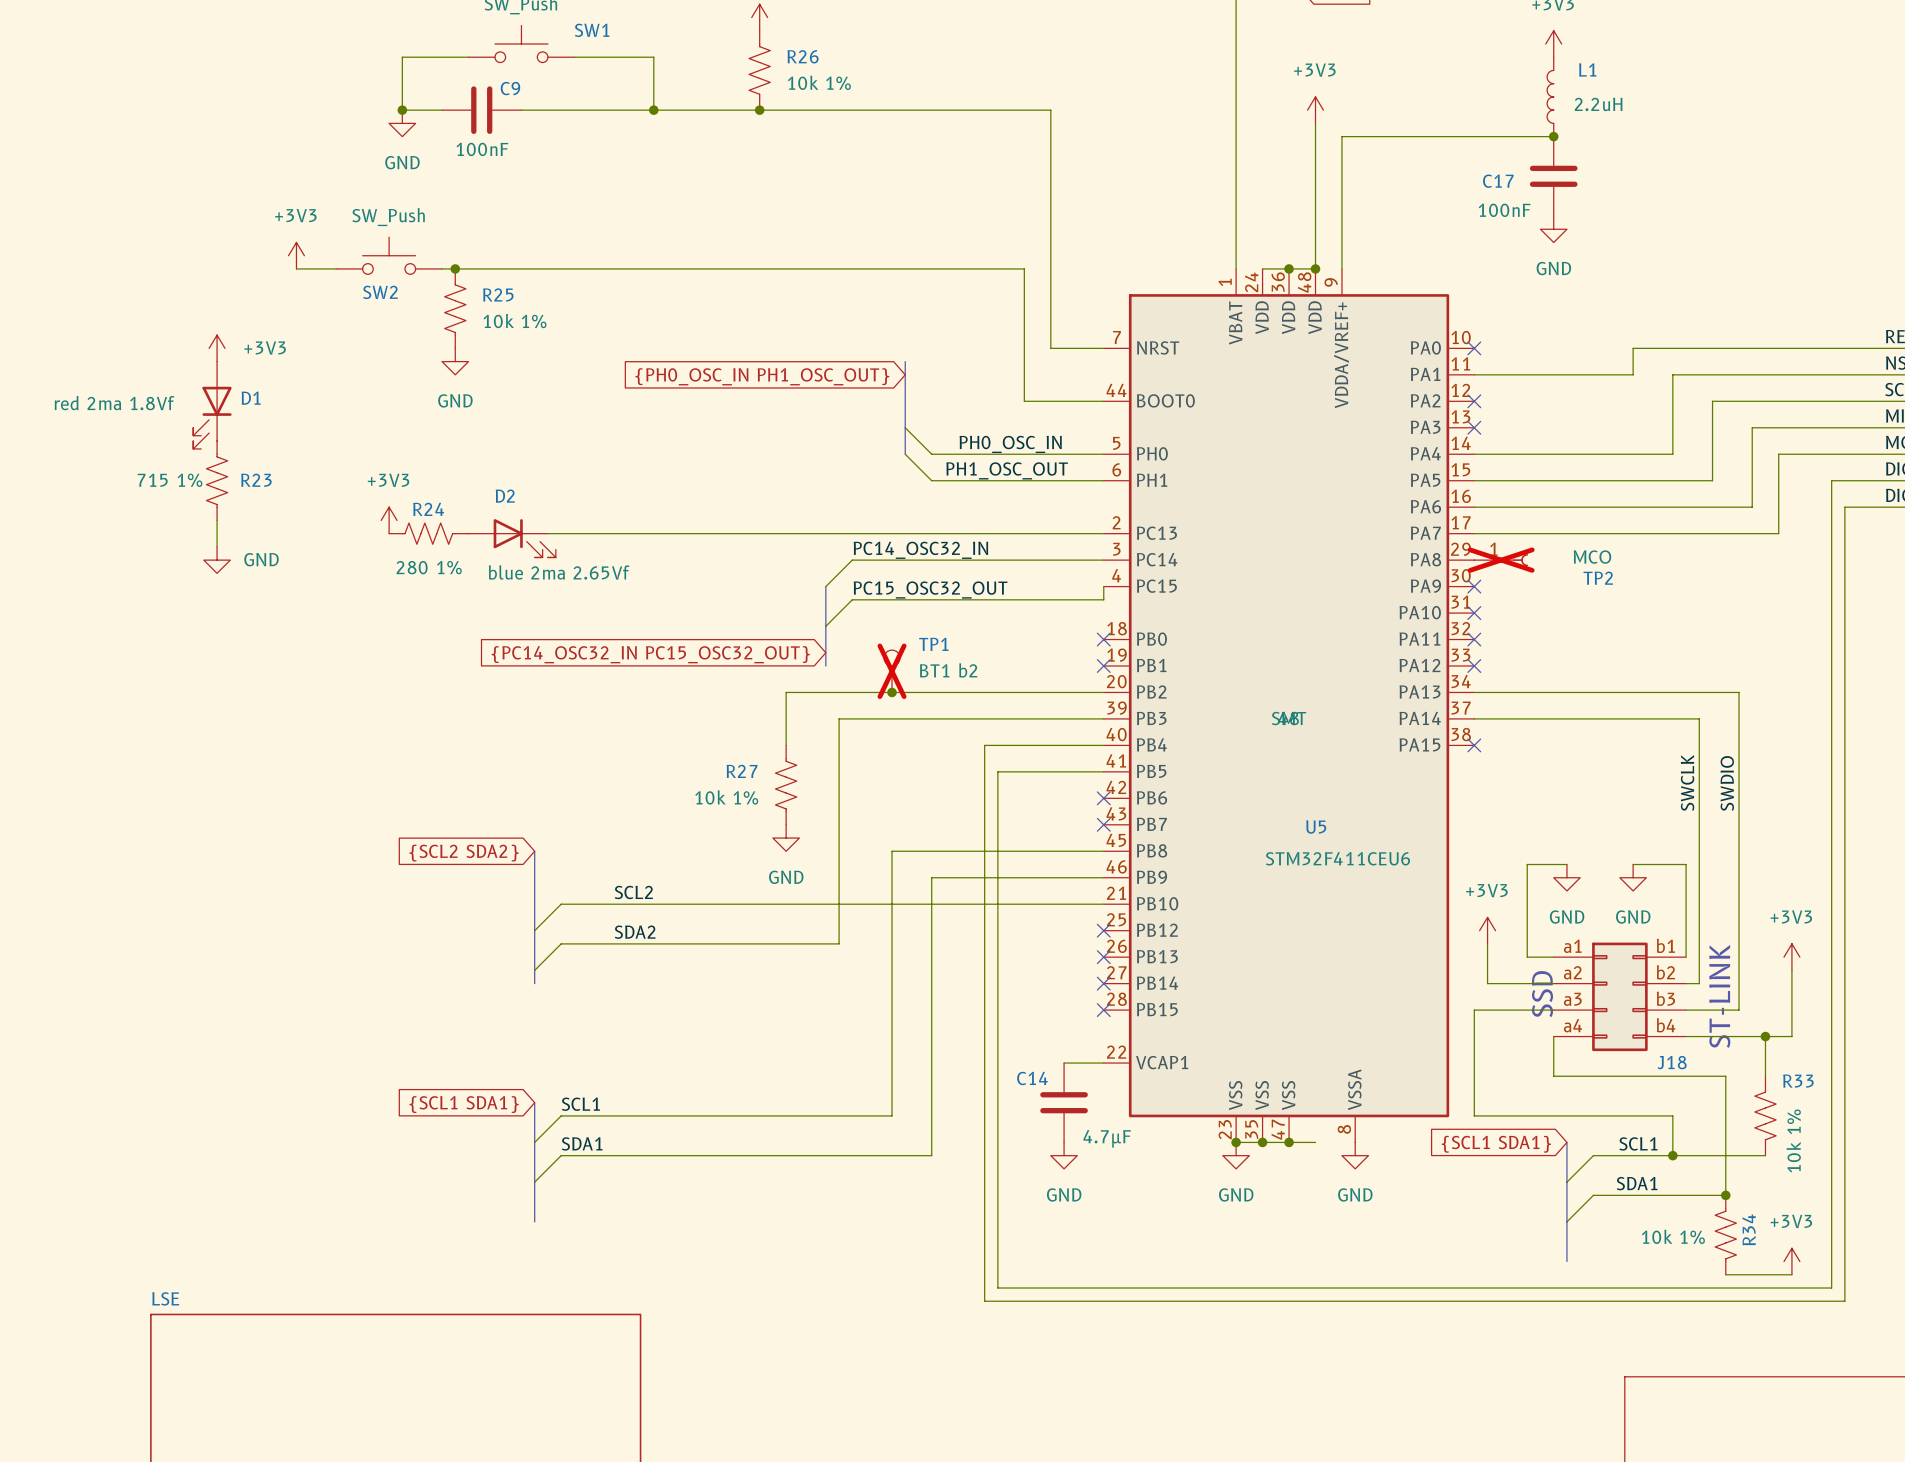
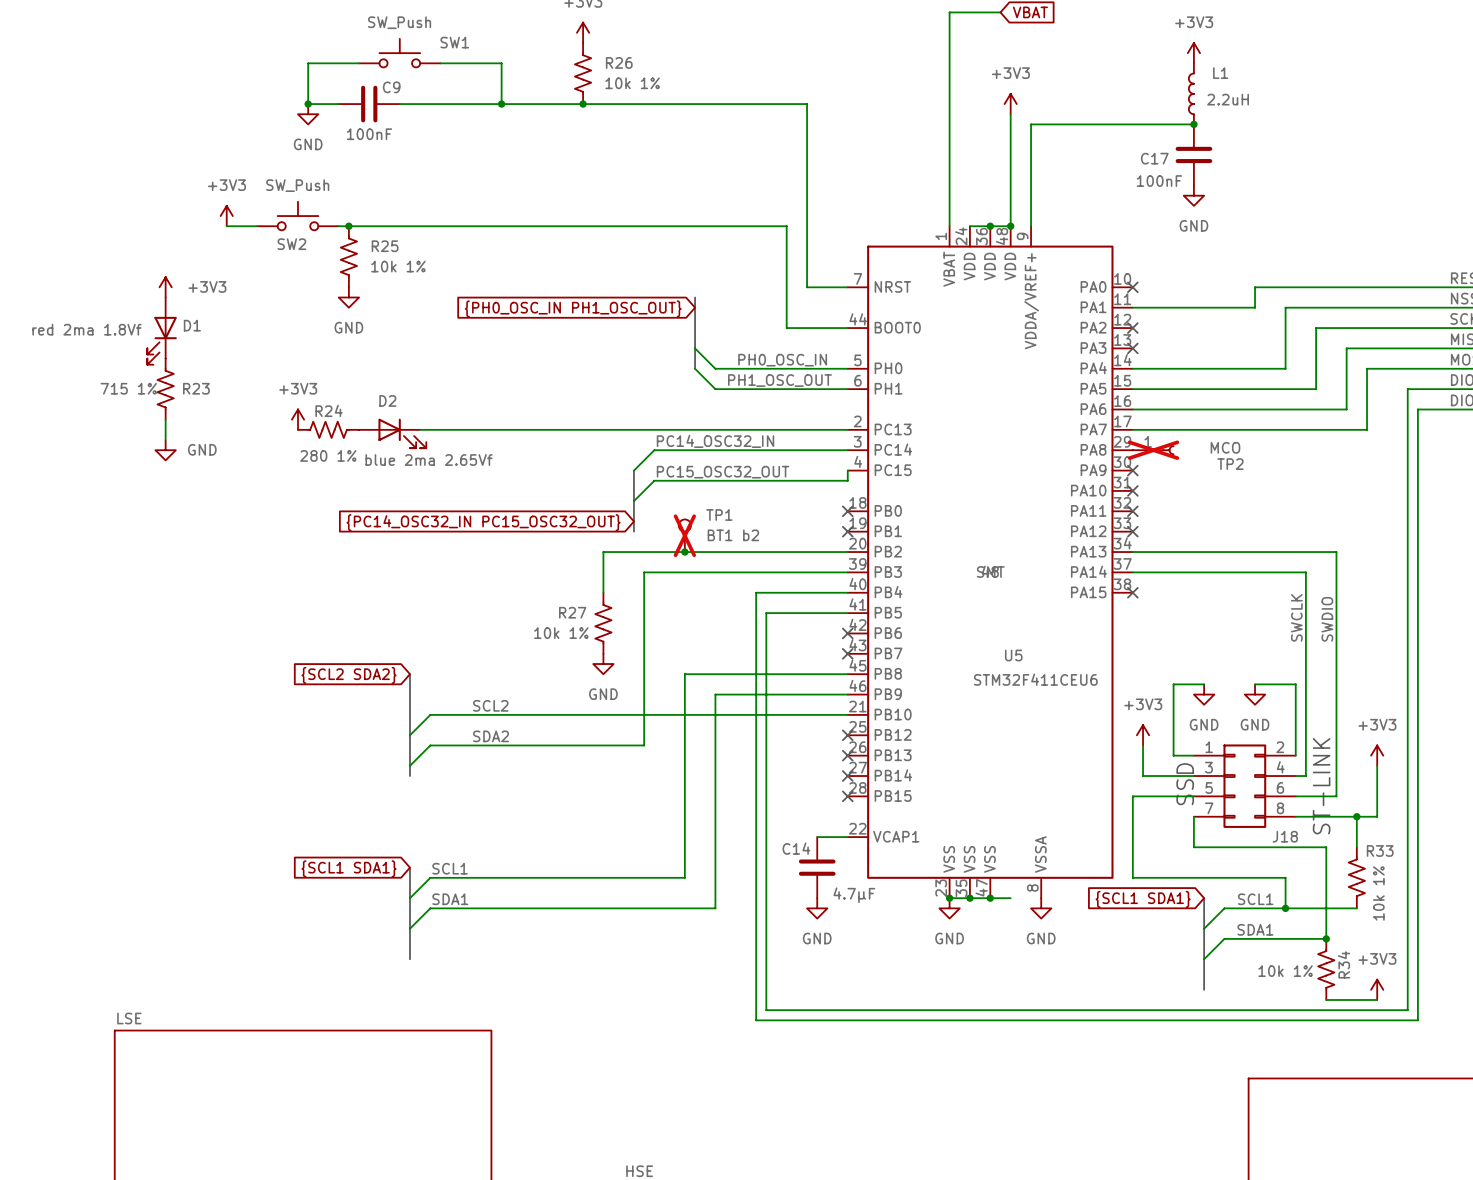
J18 pin number: b1 (1665, 945) -> 2 (1280, 747)
J18 pin number: a1 (1572, 946) -> 1 (1209, 747)
J18 pin number: a2 (1572, 972) -> 3 (1208, 767)
J18 pin number: b2 (1665, 972) -> 4 (1280, 767)
J18 pin number: b3 (1665, 998) -> 6 (1280, 787)
J18 pin number: a3 (1572, 999) -> 5 (1209, 787)
J18 pin number: a4 (1573, 1025) -> 7 (1209, 808)
J18 pin number: b4 (1666, 1025) -> 8 (1280, 808)

